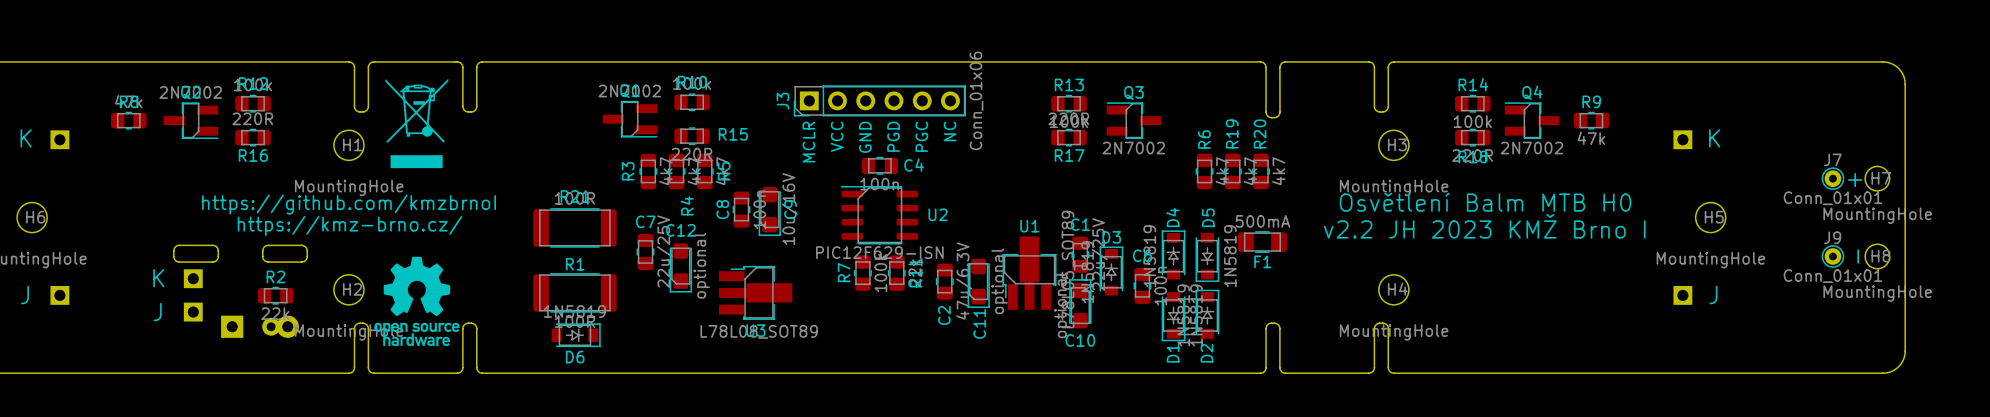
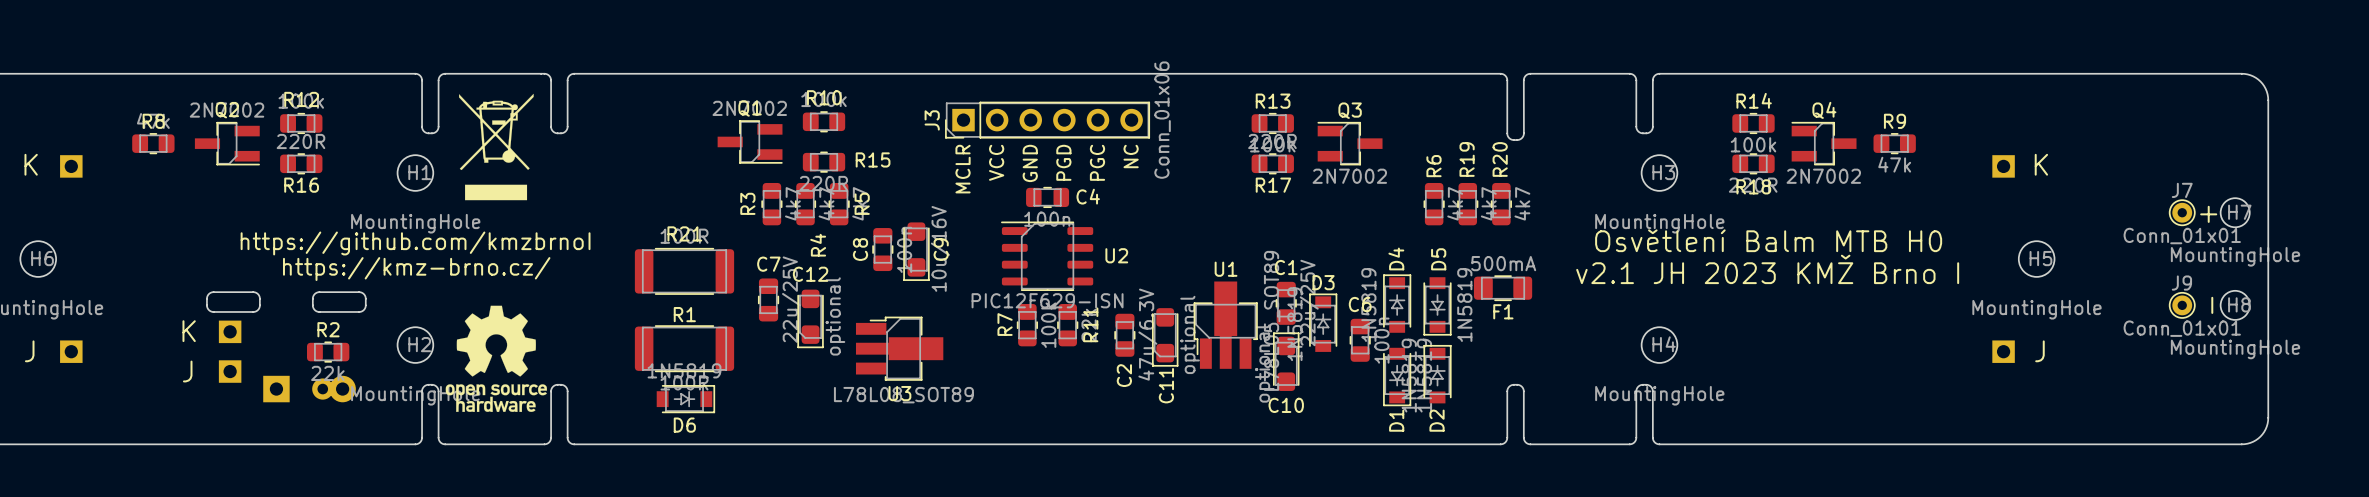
text: v2.2 JH 2023 KMŽ Brno I (1484, 226) -> v2.1 JH 2023 KMŽ Brno I (1767, 269)

